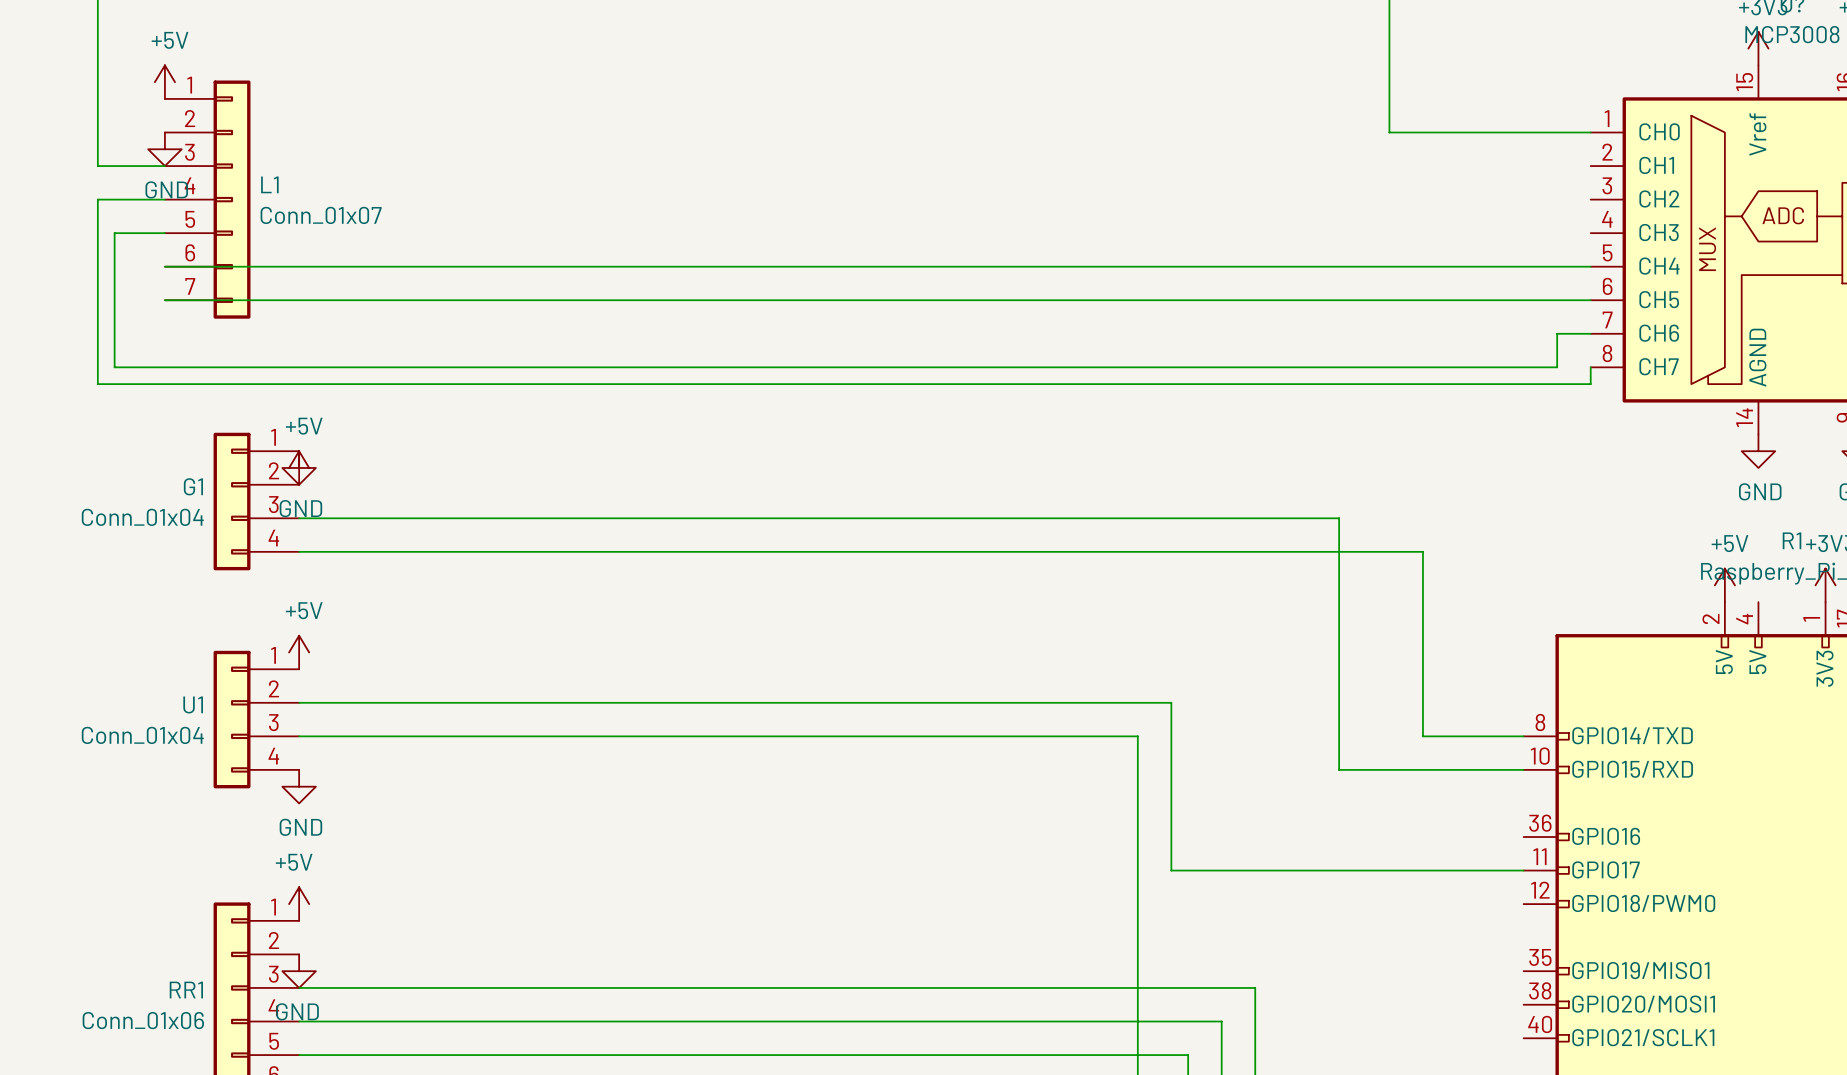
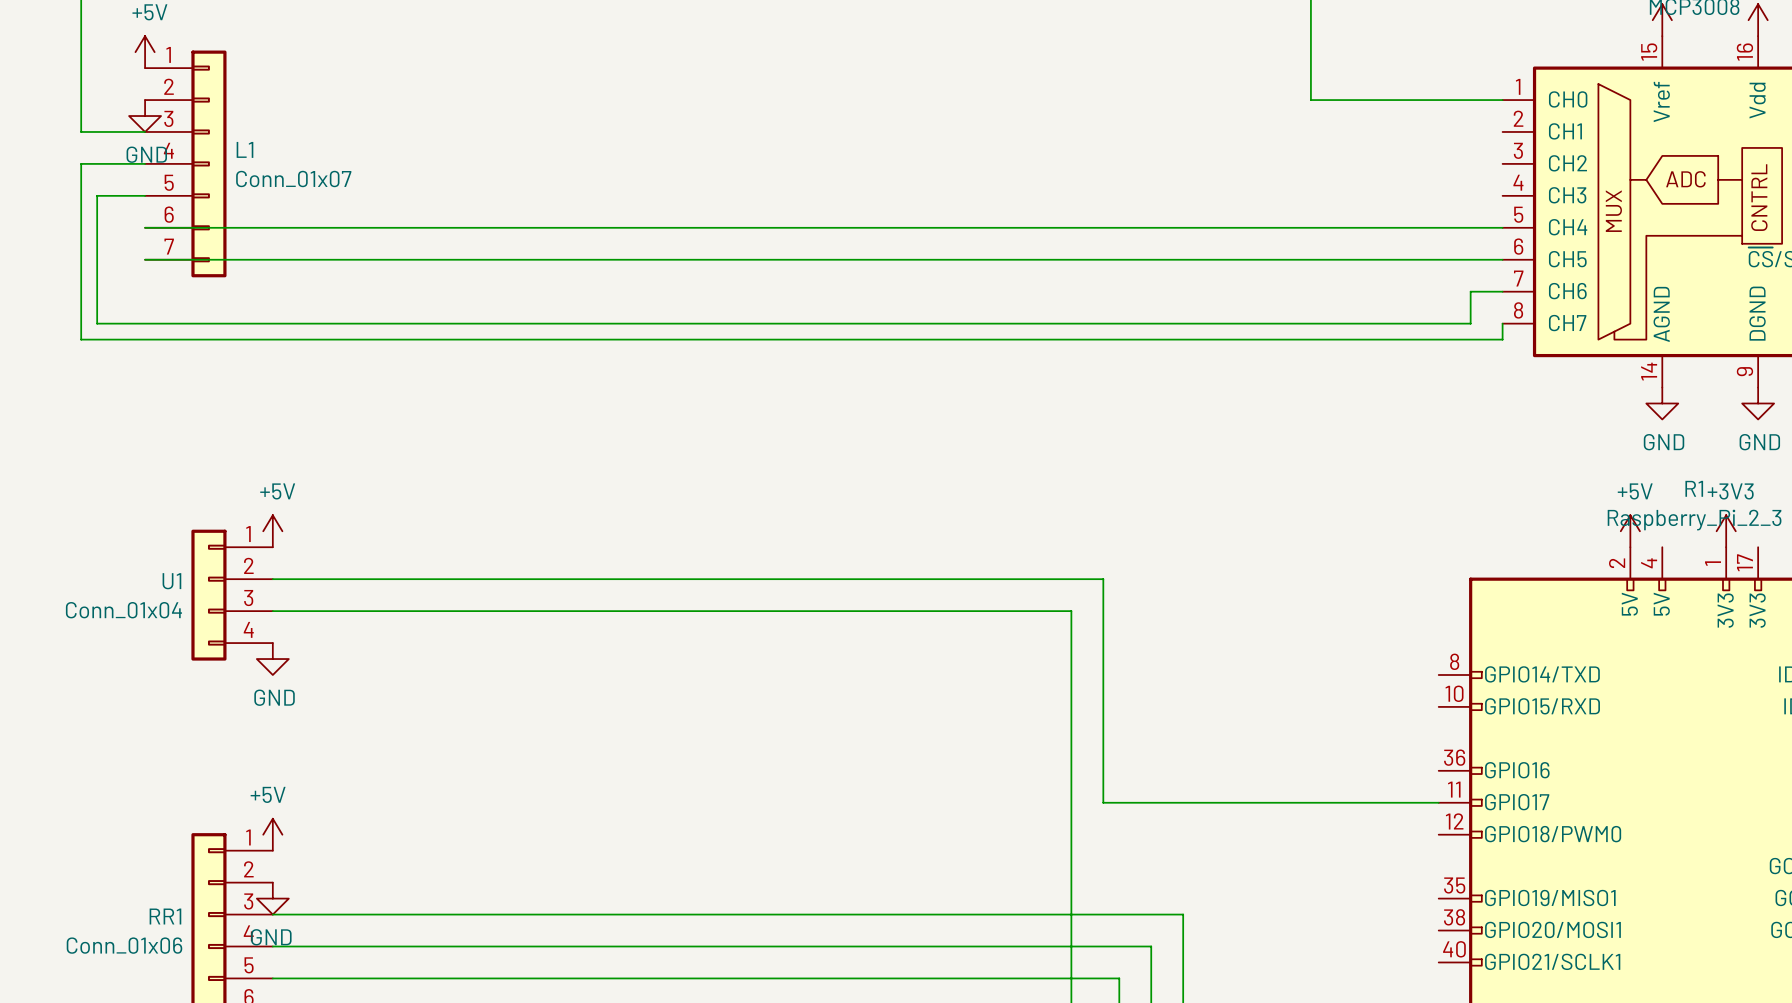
power symbol: GND (299, 467) -> none
power symbol: +5V (299, 467) -> none
G1: Conn_01x04 (256, 501) -> none
wire: (299, 518) (1339, 518) (1339, 769) (1523, 769) -> none
wire: (299, 551) (1422, 551) (1422, 736) (1523, 736) -> none
power symbol: none -> +5V (272, 531)
power symbol: +5V (299, 652) -> none
wire: (299, 702) (1171, 702) -> (272, 579) (1103, 579) (1103, 643)
U1 position: (256, 719) -> (232, 595)
wire: (299, 736) (1137, 736) -> (272, 611) (1071, 611) (1071, 674)
power symbol position: GND (299, 786) -> GND (272, 659)

